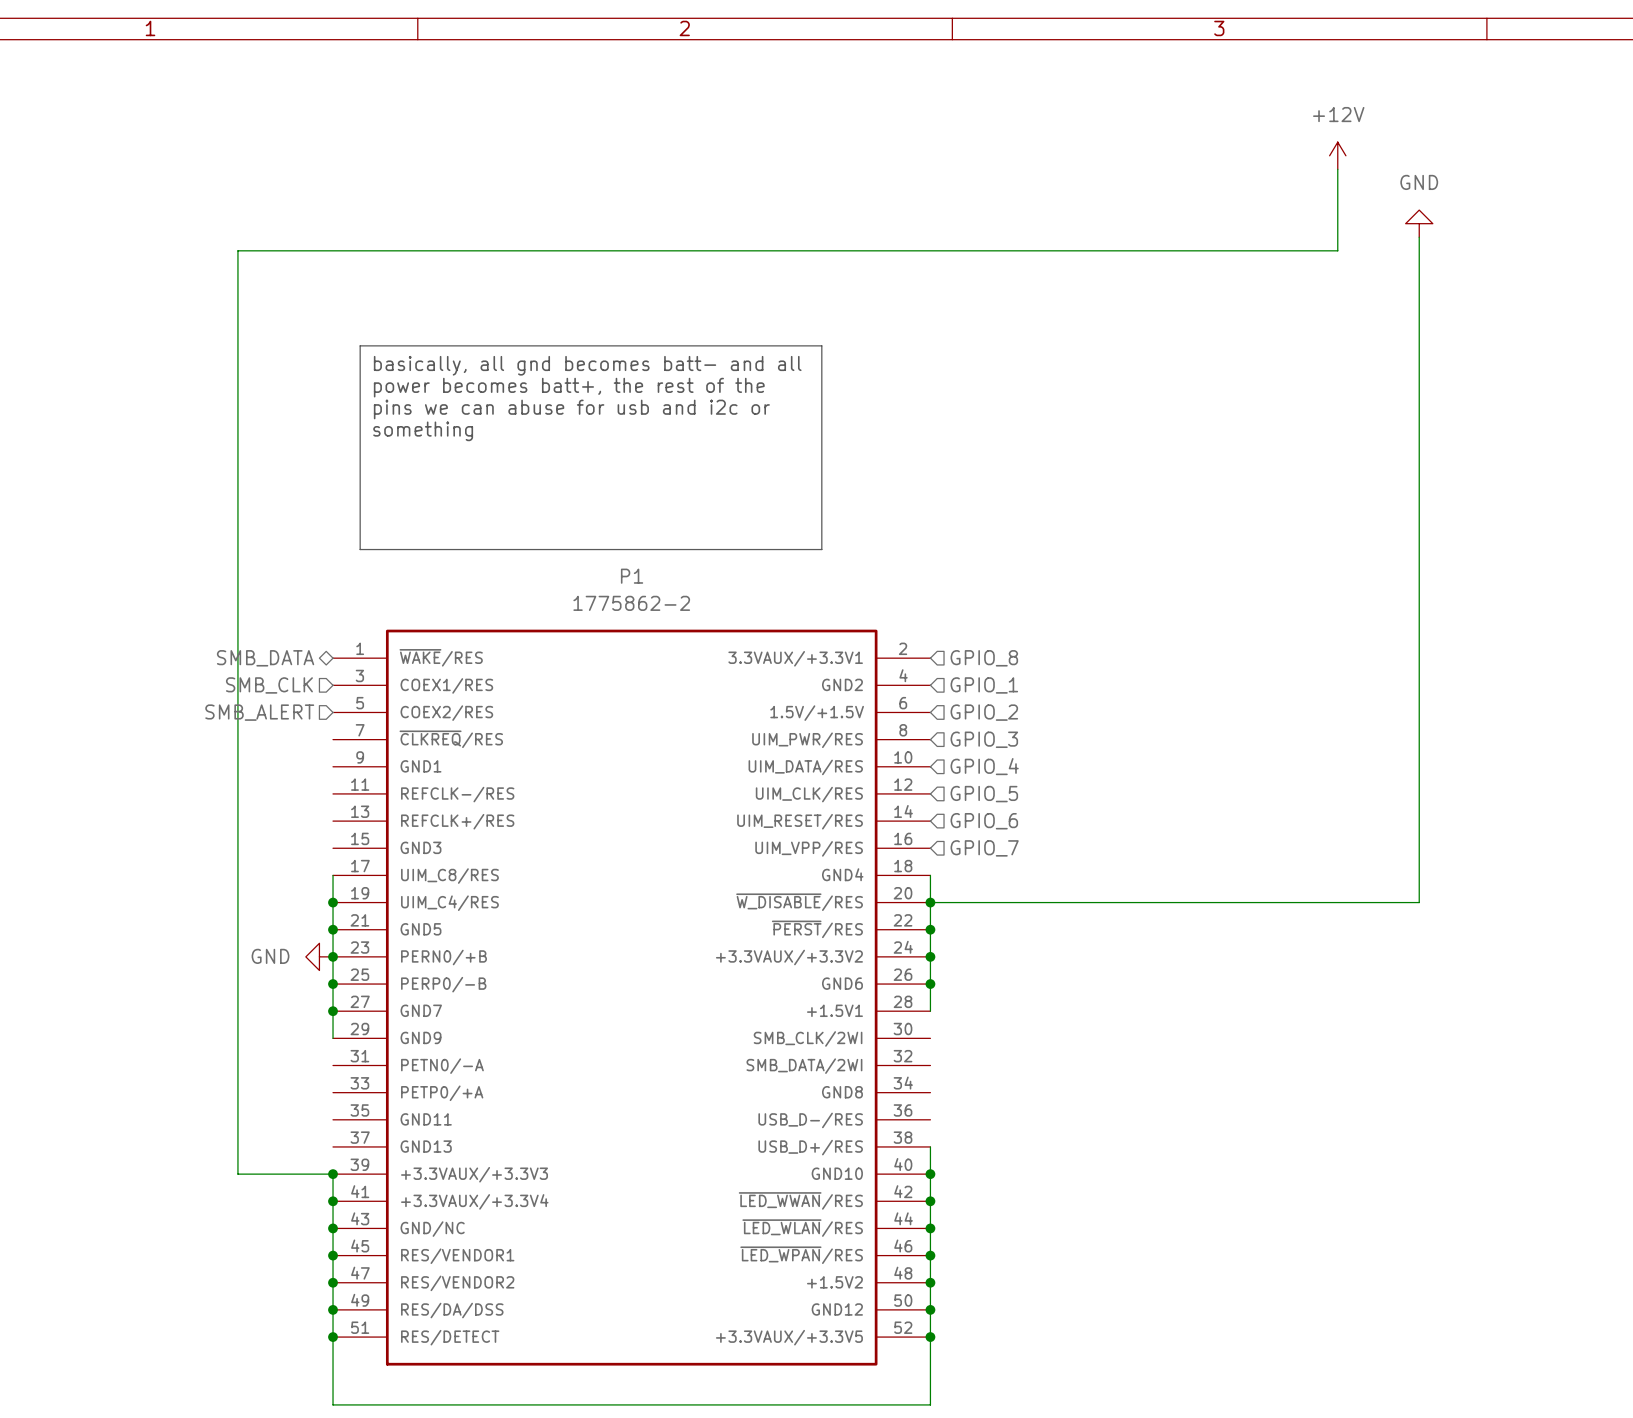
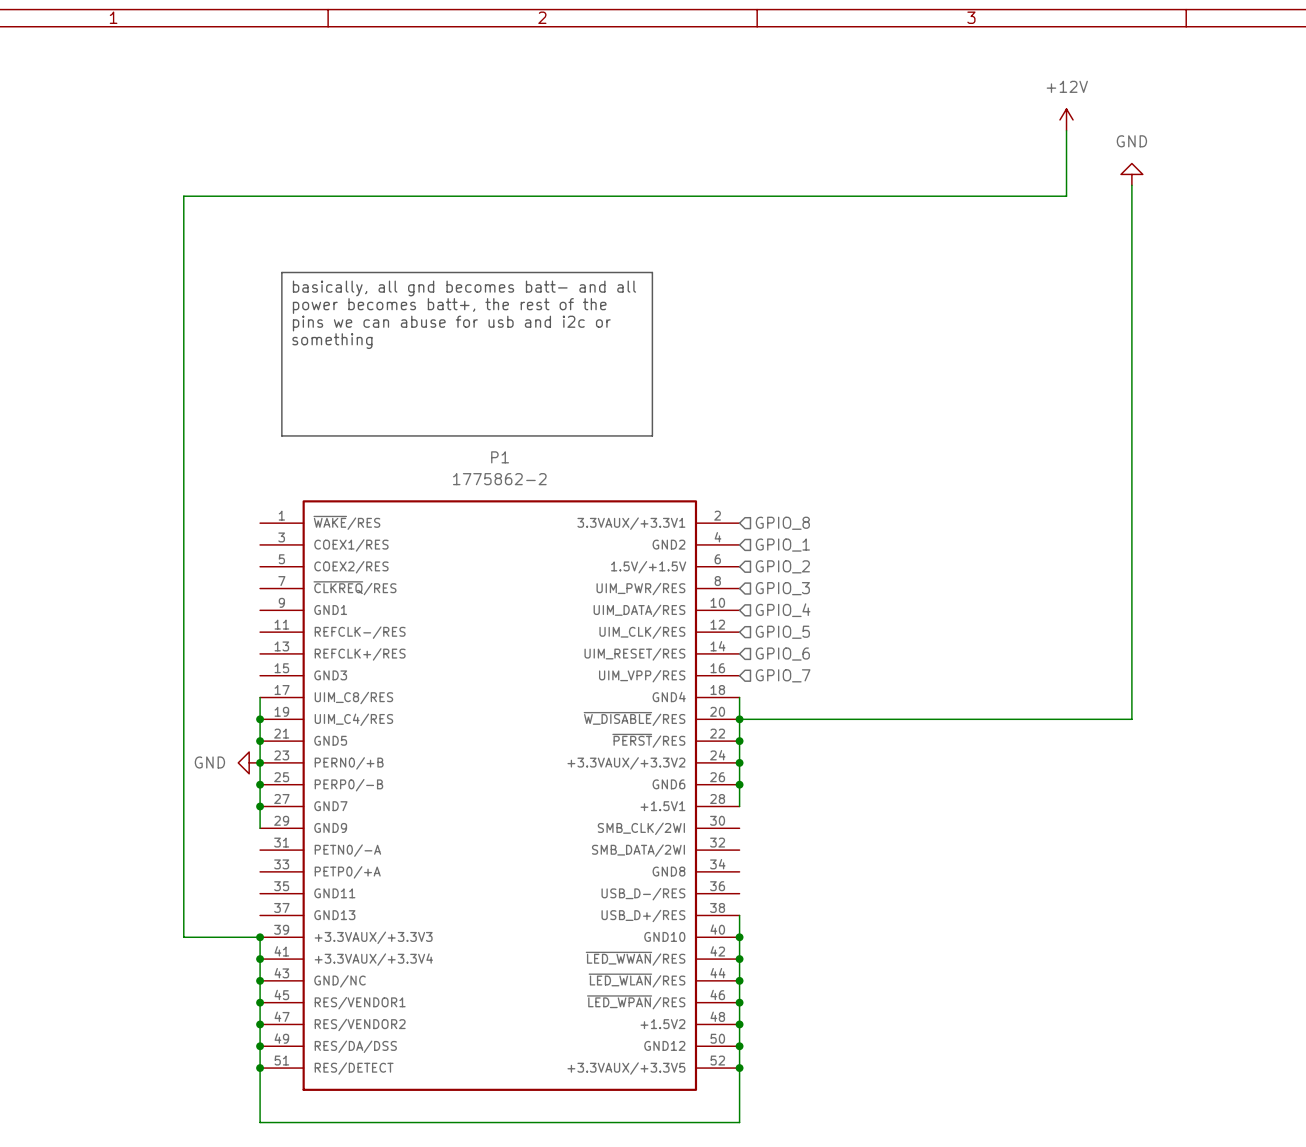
hierarchical label: SMB_DATA (265, 658) -> none
hierarchical label: SMB_CLK (269, 685) -> none
hierarchical label: SMB_ALERT (259, 712) -> none

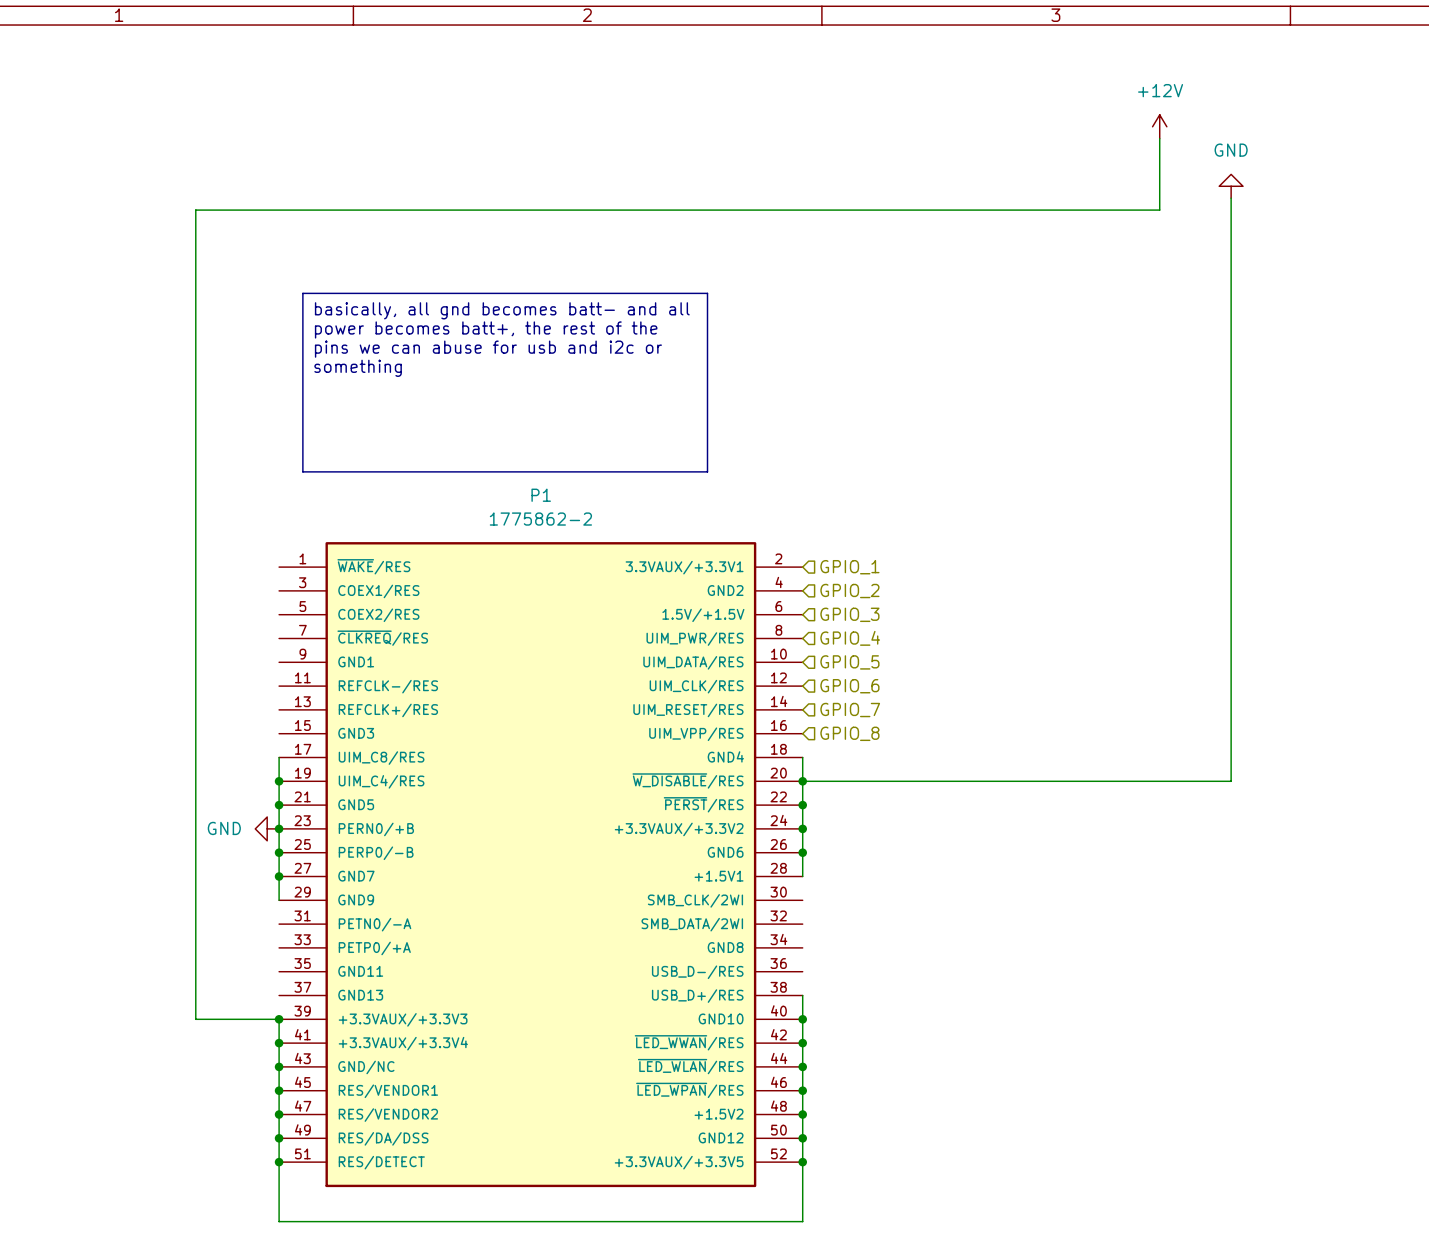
hierarchical label: GPIO_8 (782, 523) -> GPIO_1 (849, 567)
hierarchical label: GPIO_1 (782, 545) -> GPIO_2 (849, 591)
hierarchical label: GPIO_2 (782, 566) -> GPIO_3 (849, 614)
hierarchical label: GPIO_3 (782, 588) -> GPIO_4 (850, 638)
hierarchical label: GPIO_4 (783, 610) -> GPIO_5 (849, 662)
hierarchical label: GPIO_5 (782, 632) -> GPIO_6 (849, 686)
hierarchical label: GPIO_6 (782, 654) -> GPIO_7 (850, 710)
hierarchical label: GPIO_7 (783, 675) -> GPIO_8 (849, 733)

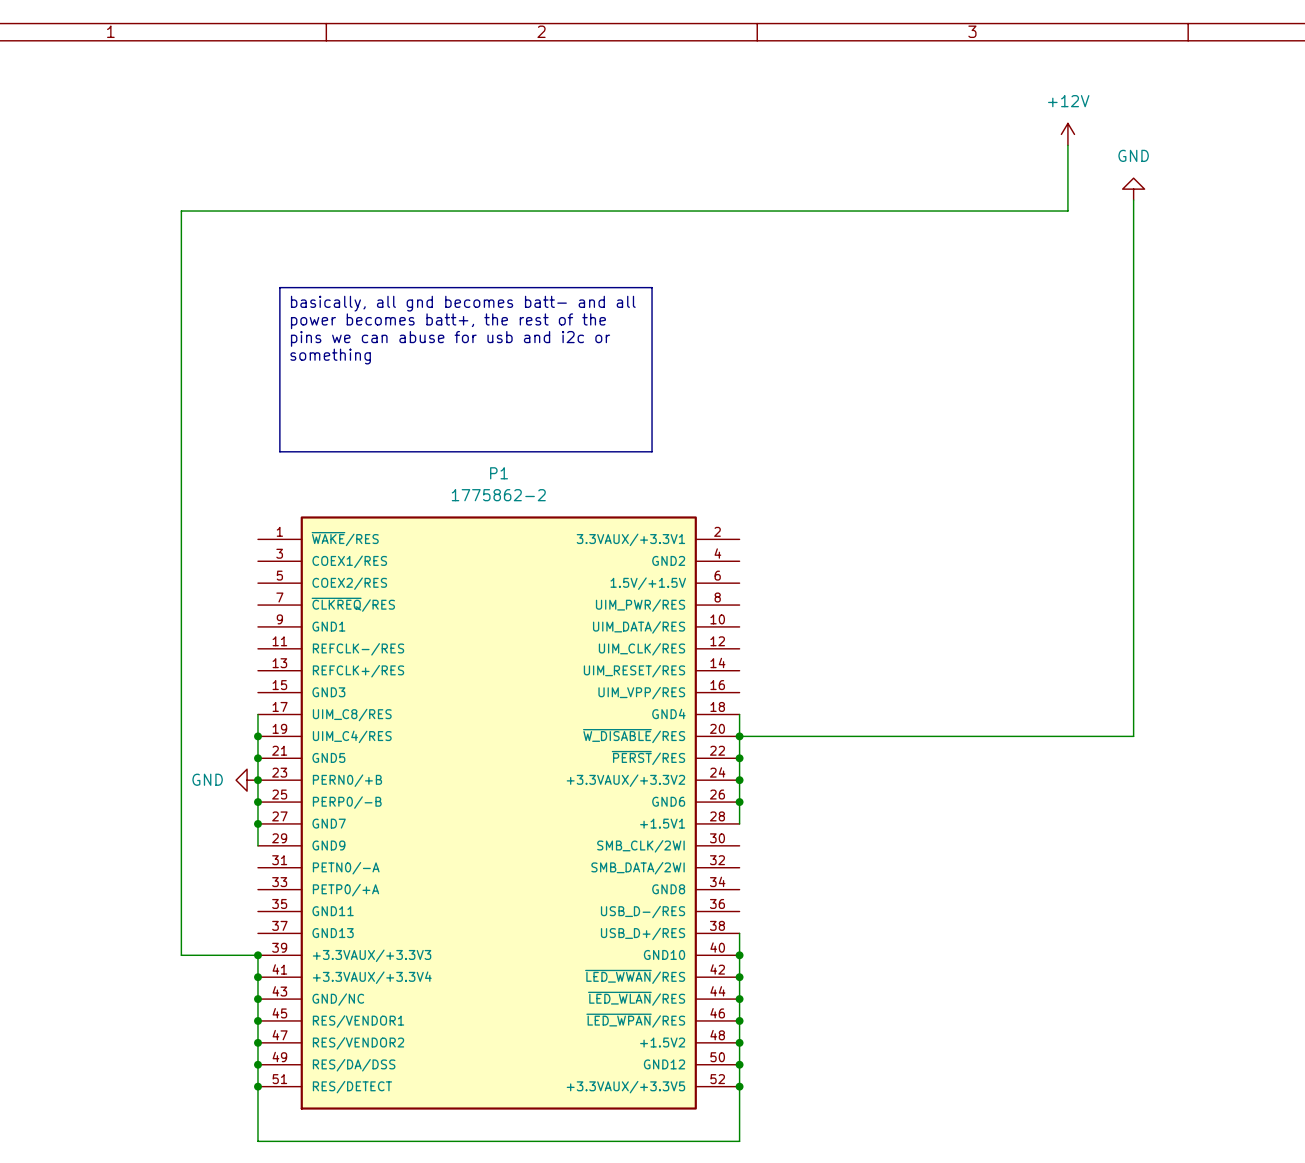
hierarchical label: GPIO_1 (849, 567) -> none
hierarchical label: GPIO_2 (849, 591) -> none
hierarchical label: GPIO_3 (849, 614) -> none
hierarchical label: GPIO_4 (850, 638) -> none
hierarchical label: GPIO_5 (849, 662) -> none
hierarchical label: GPIO_6 (849, 686) -> none
hierarchical label: GPIO_7 (850, 710) -> none
hierarchical label: GPIO_8 (849, 733) -> none

